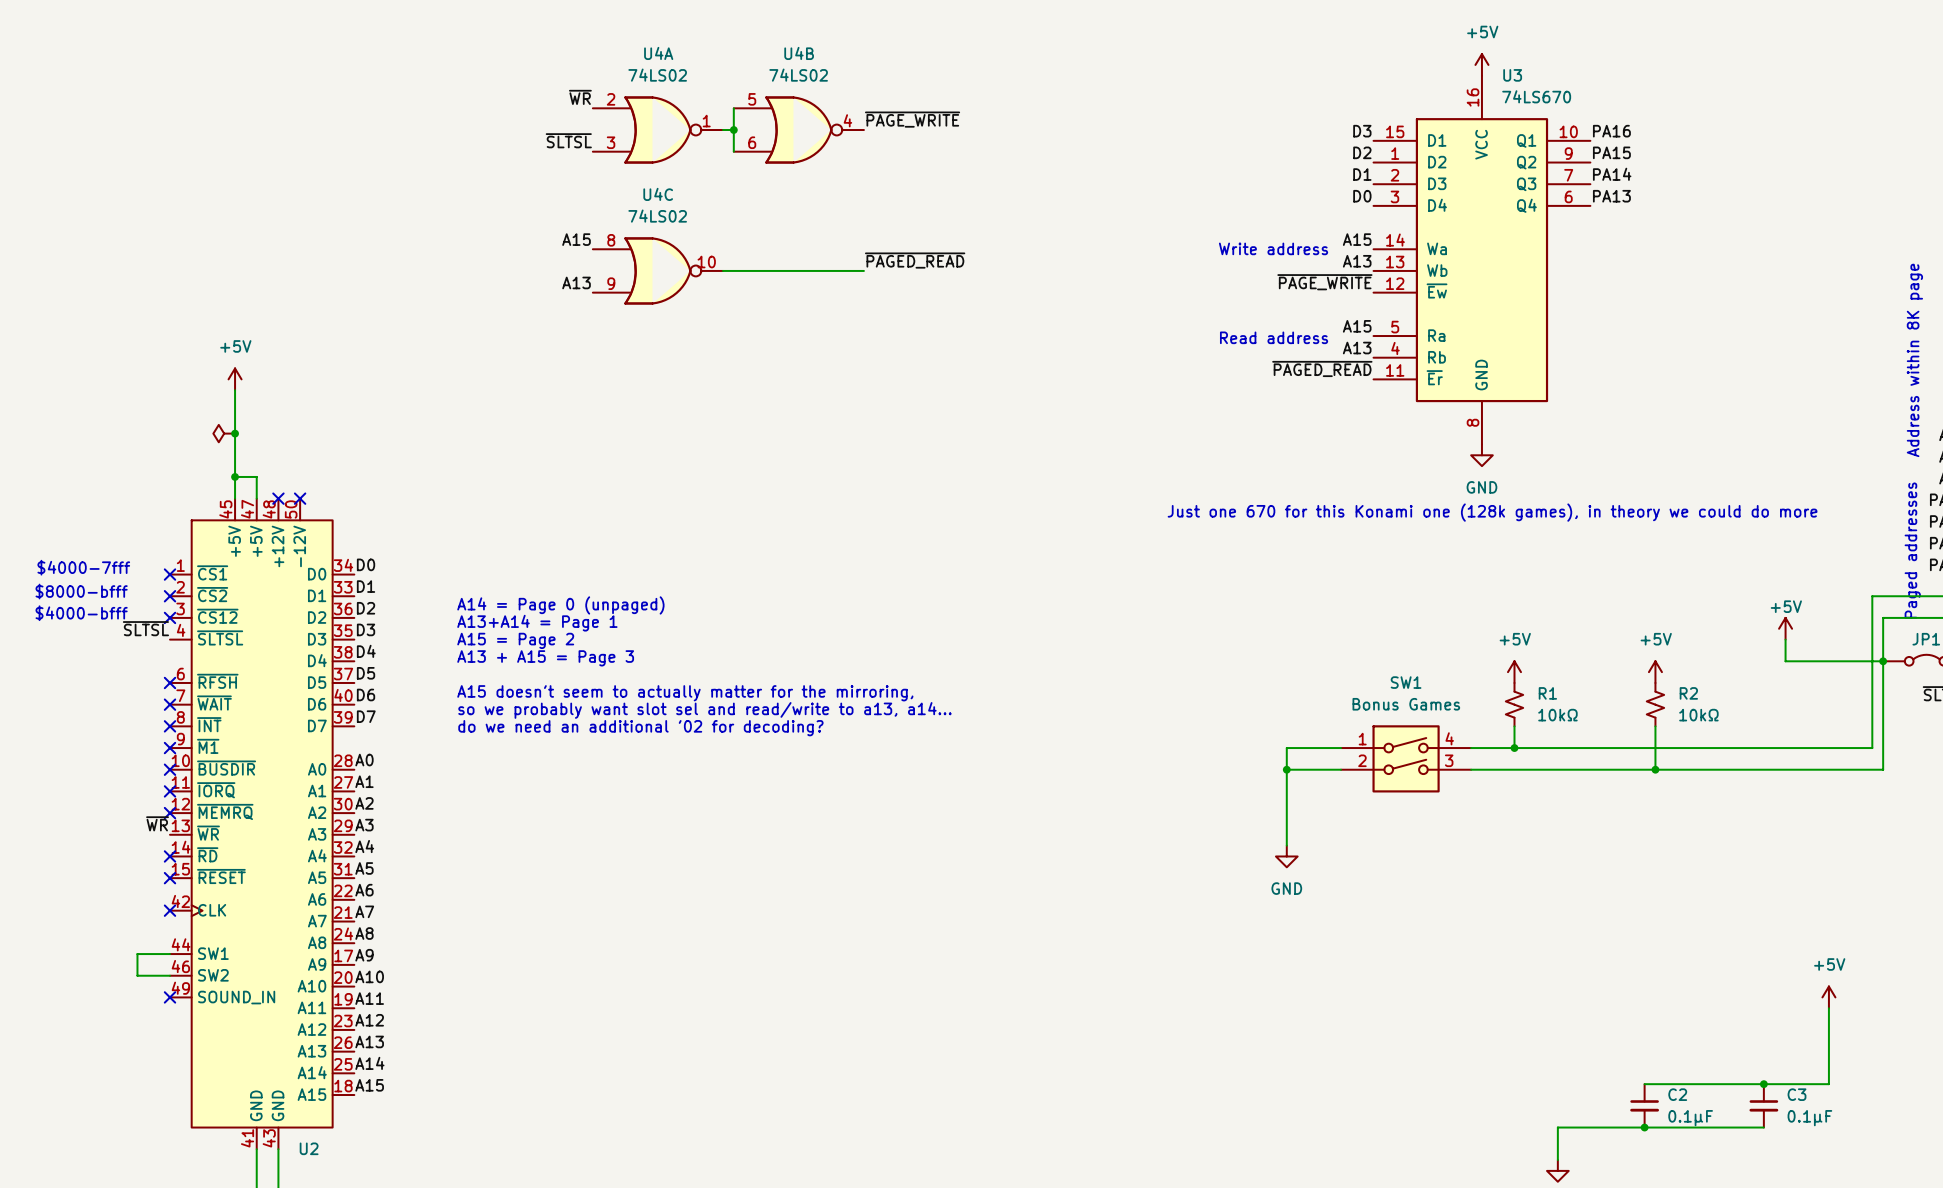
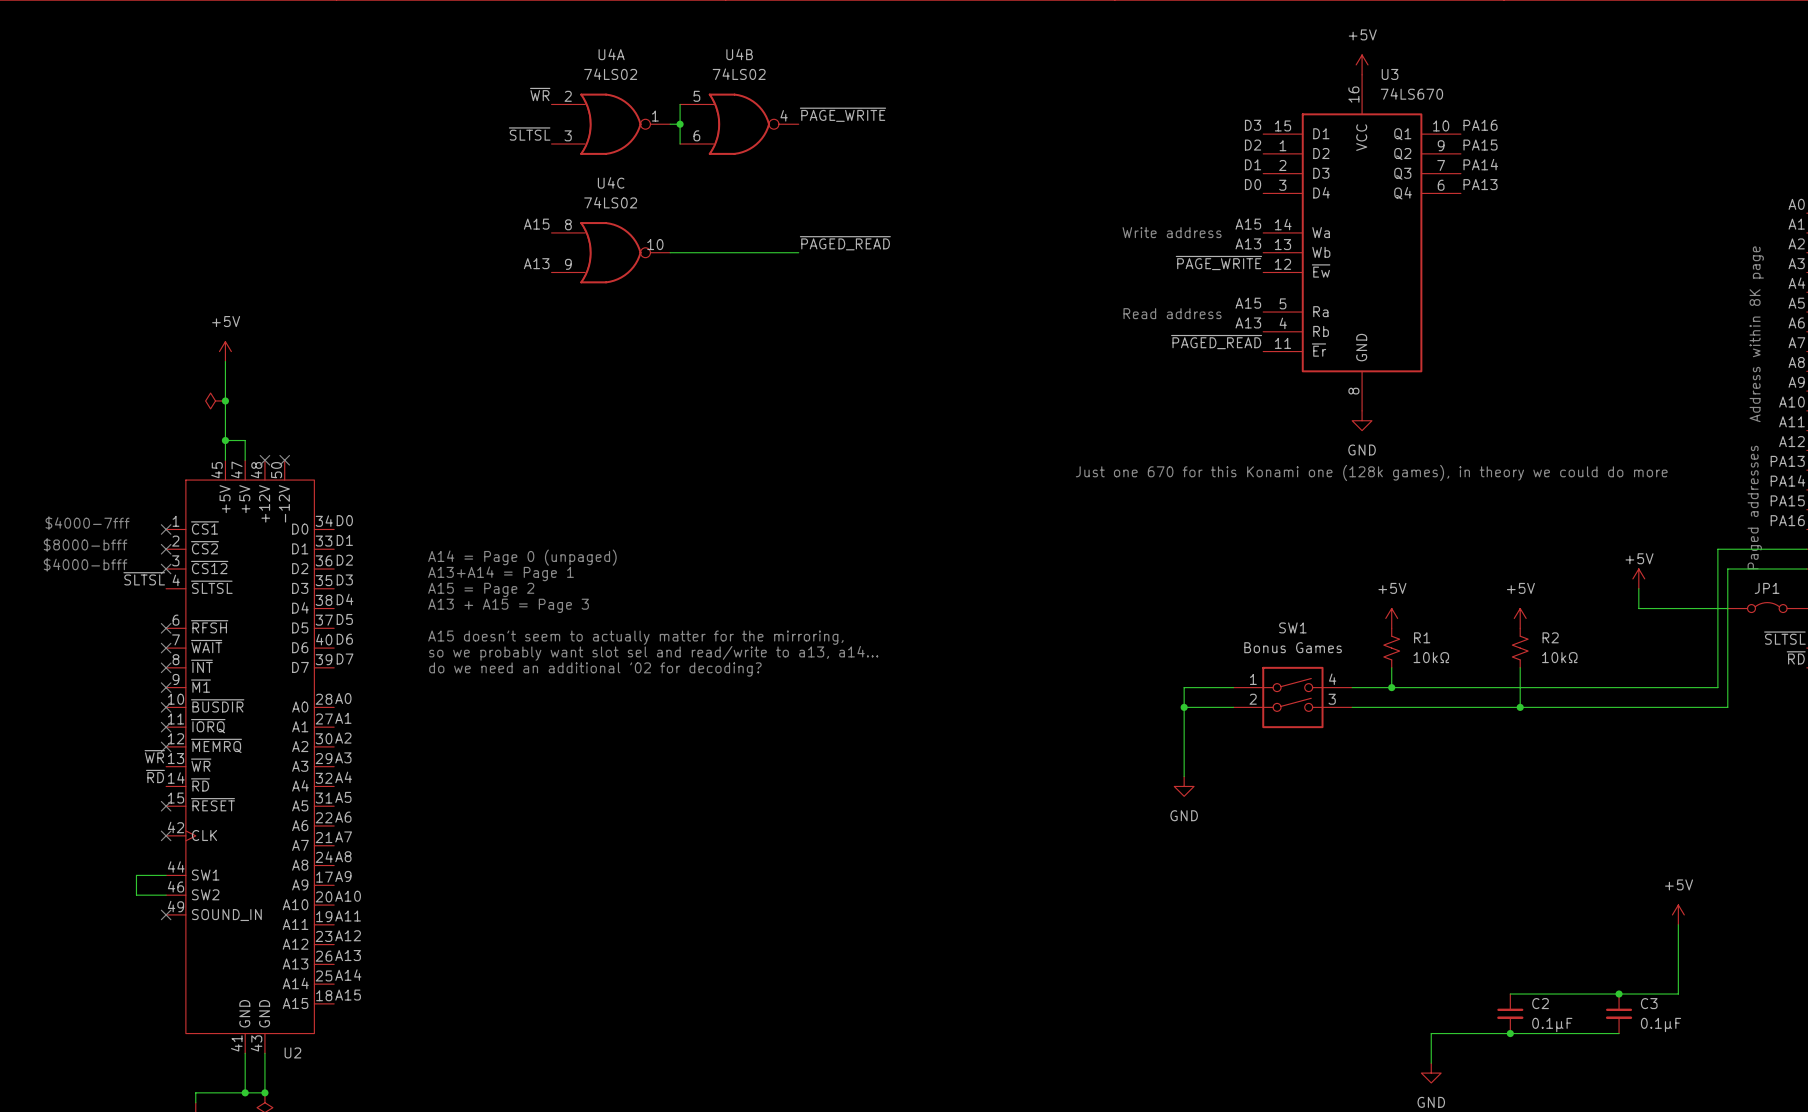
junction: (1883, 661) -> none
label: none -> ~{RD} (155, 776)
no-connect mark: (170, 856) -> none

